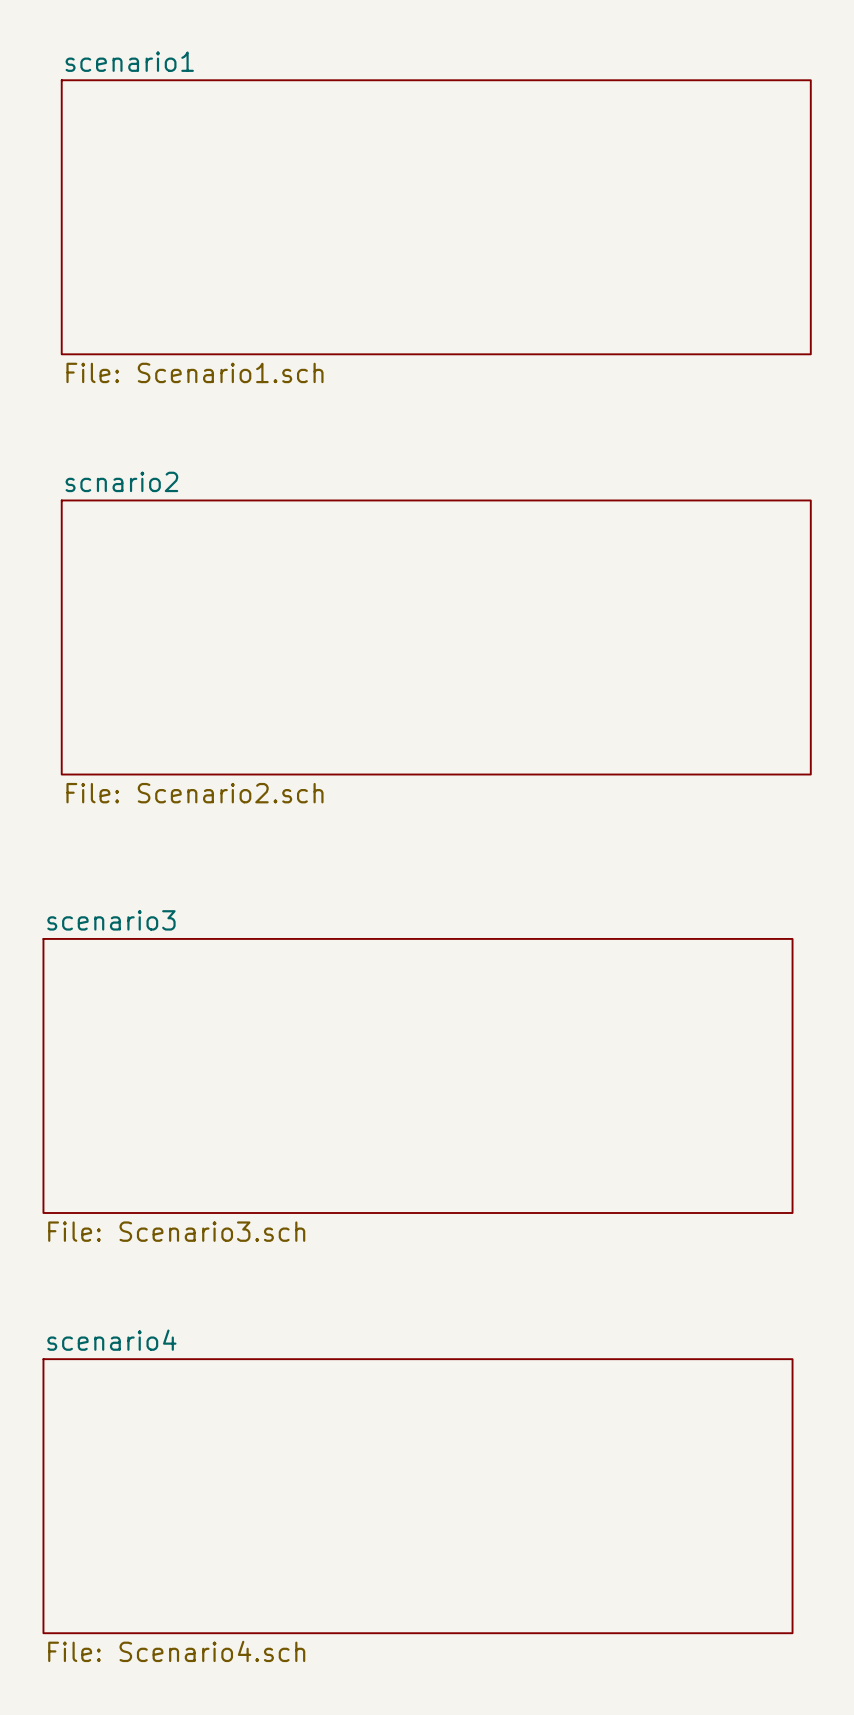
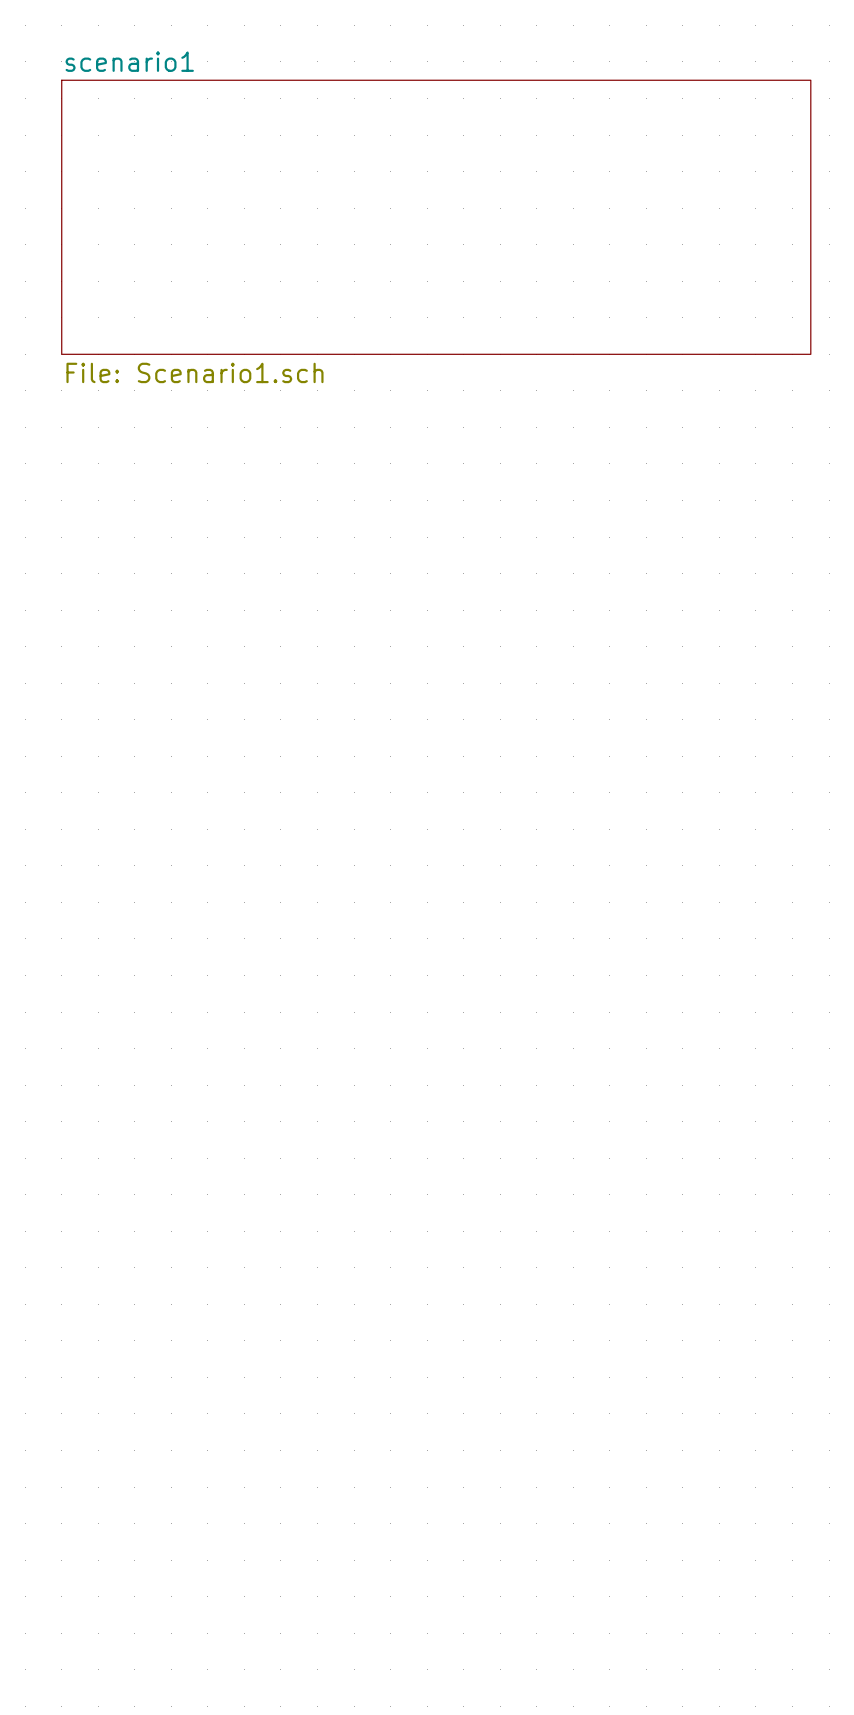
sheet scnario2: File: Scenario2.sch (436, 637) -> none
sheet scenario3: File: Scenario3.sch (418, 1075) -> none
sheet scenario4: File: Scenario4.sch (418, 1496) -> none

